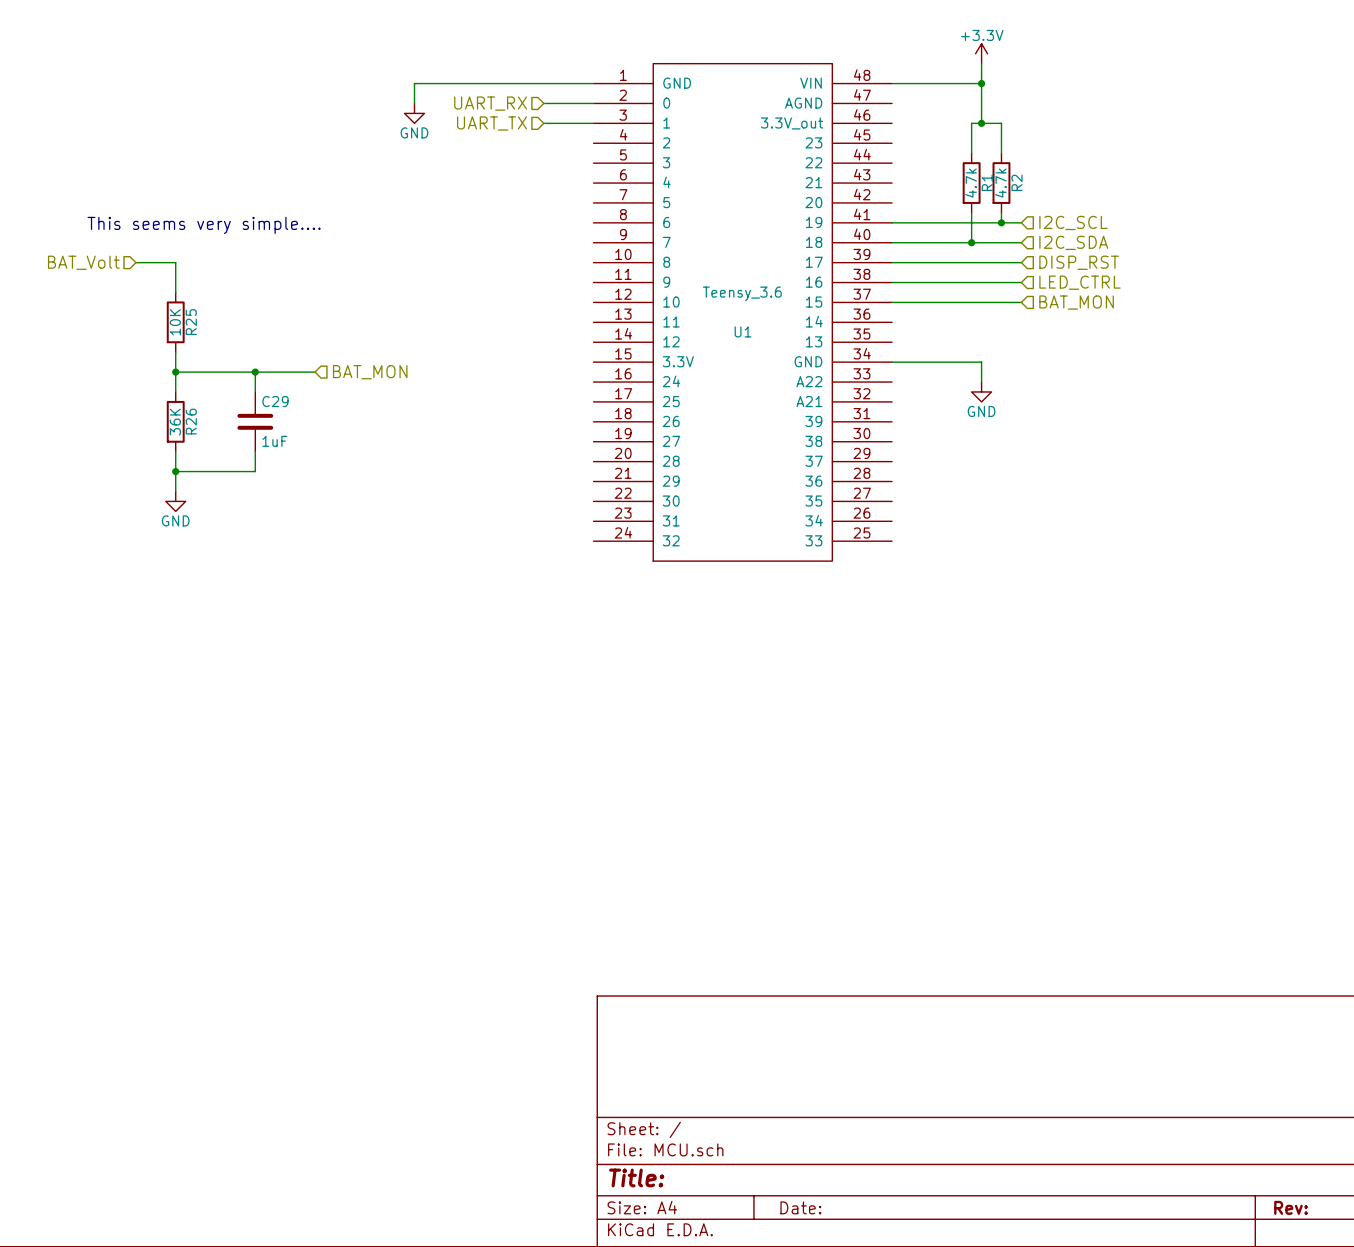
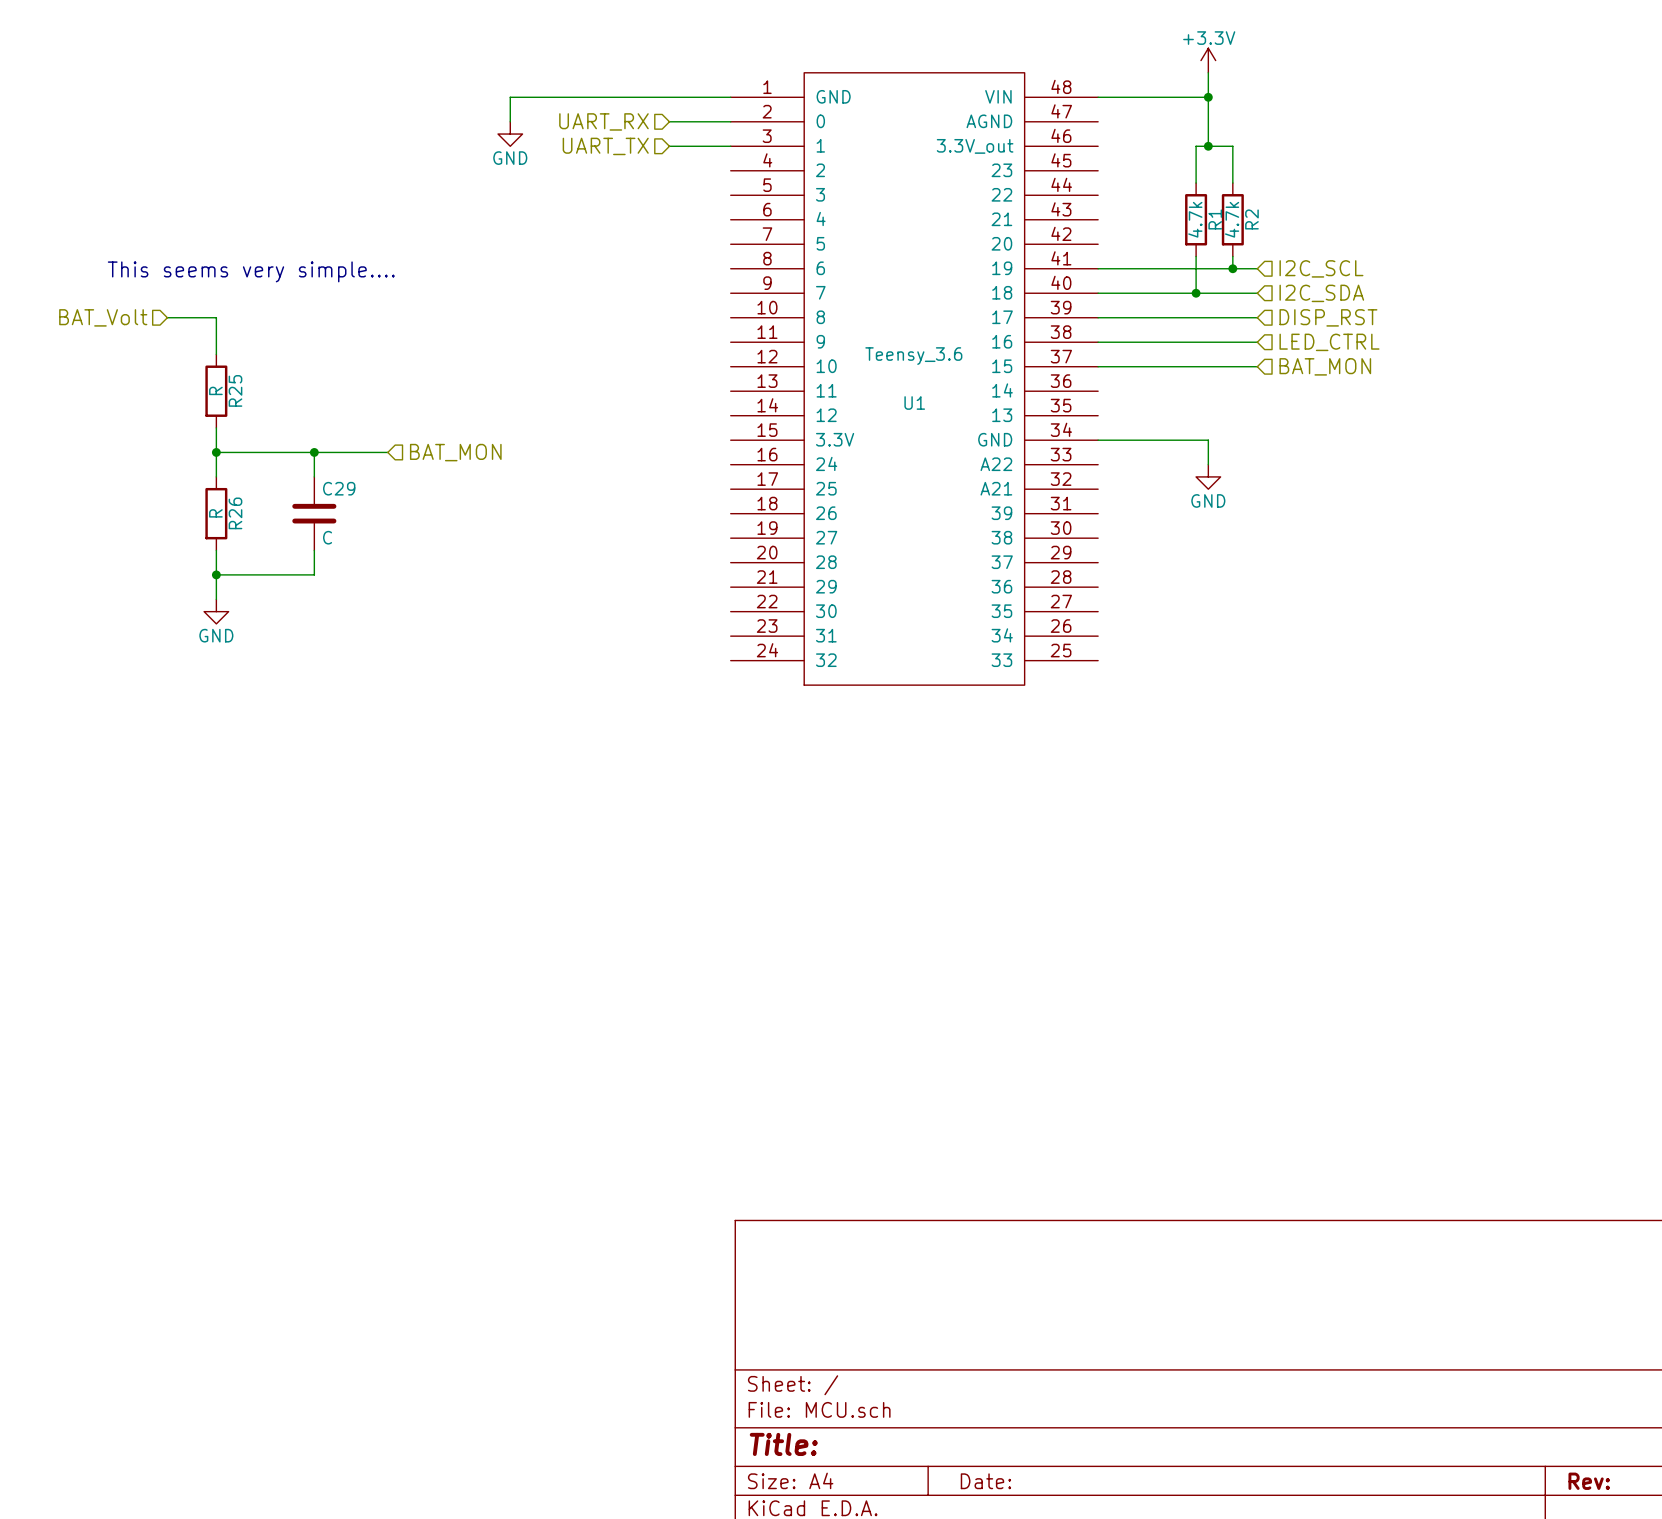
R25 value: 10K (175, 322) -> R (215, 390)
R26 value: 36K (175, 422) -> R (215, 513)
C29 value: 1uF (274, 441) -> C (327, 537)

